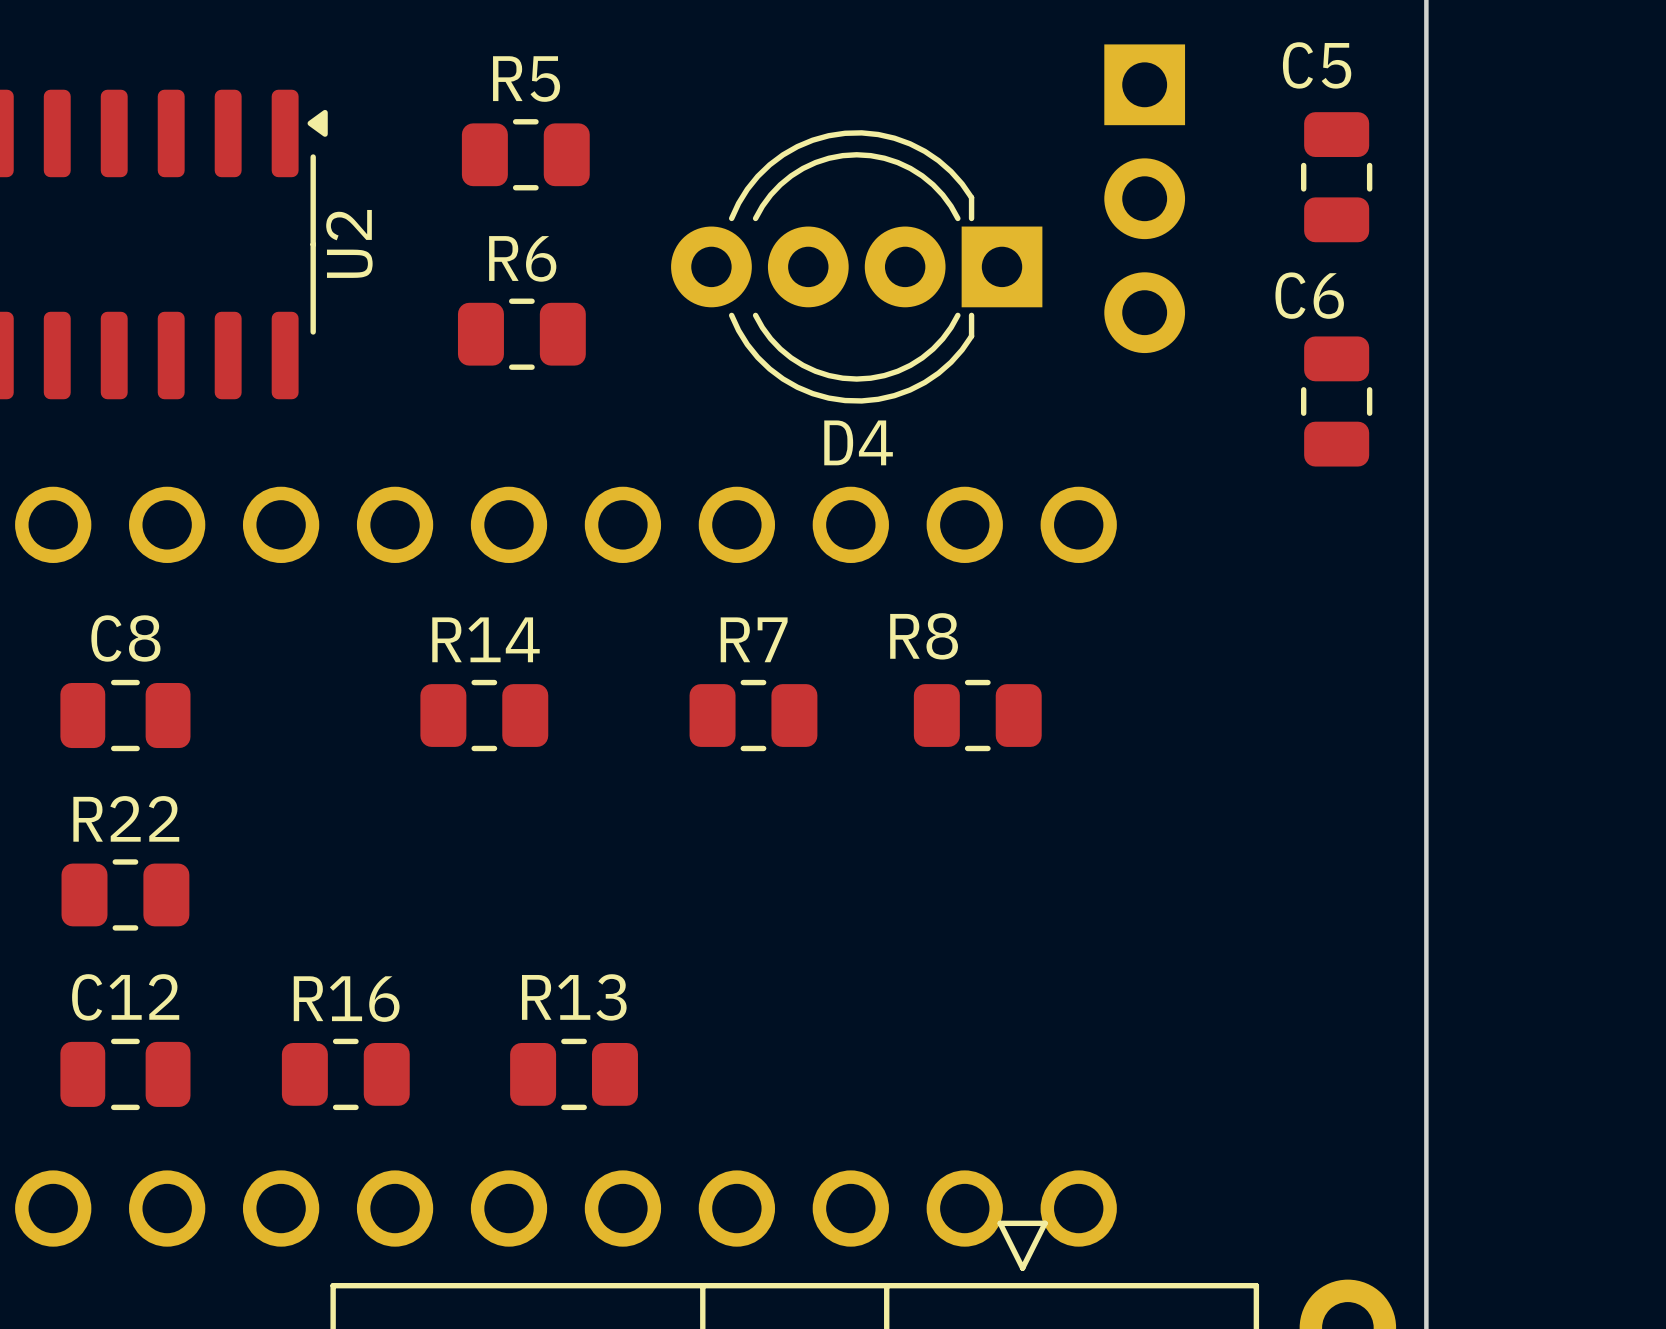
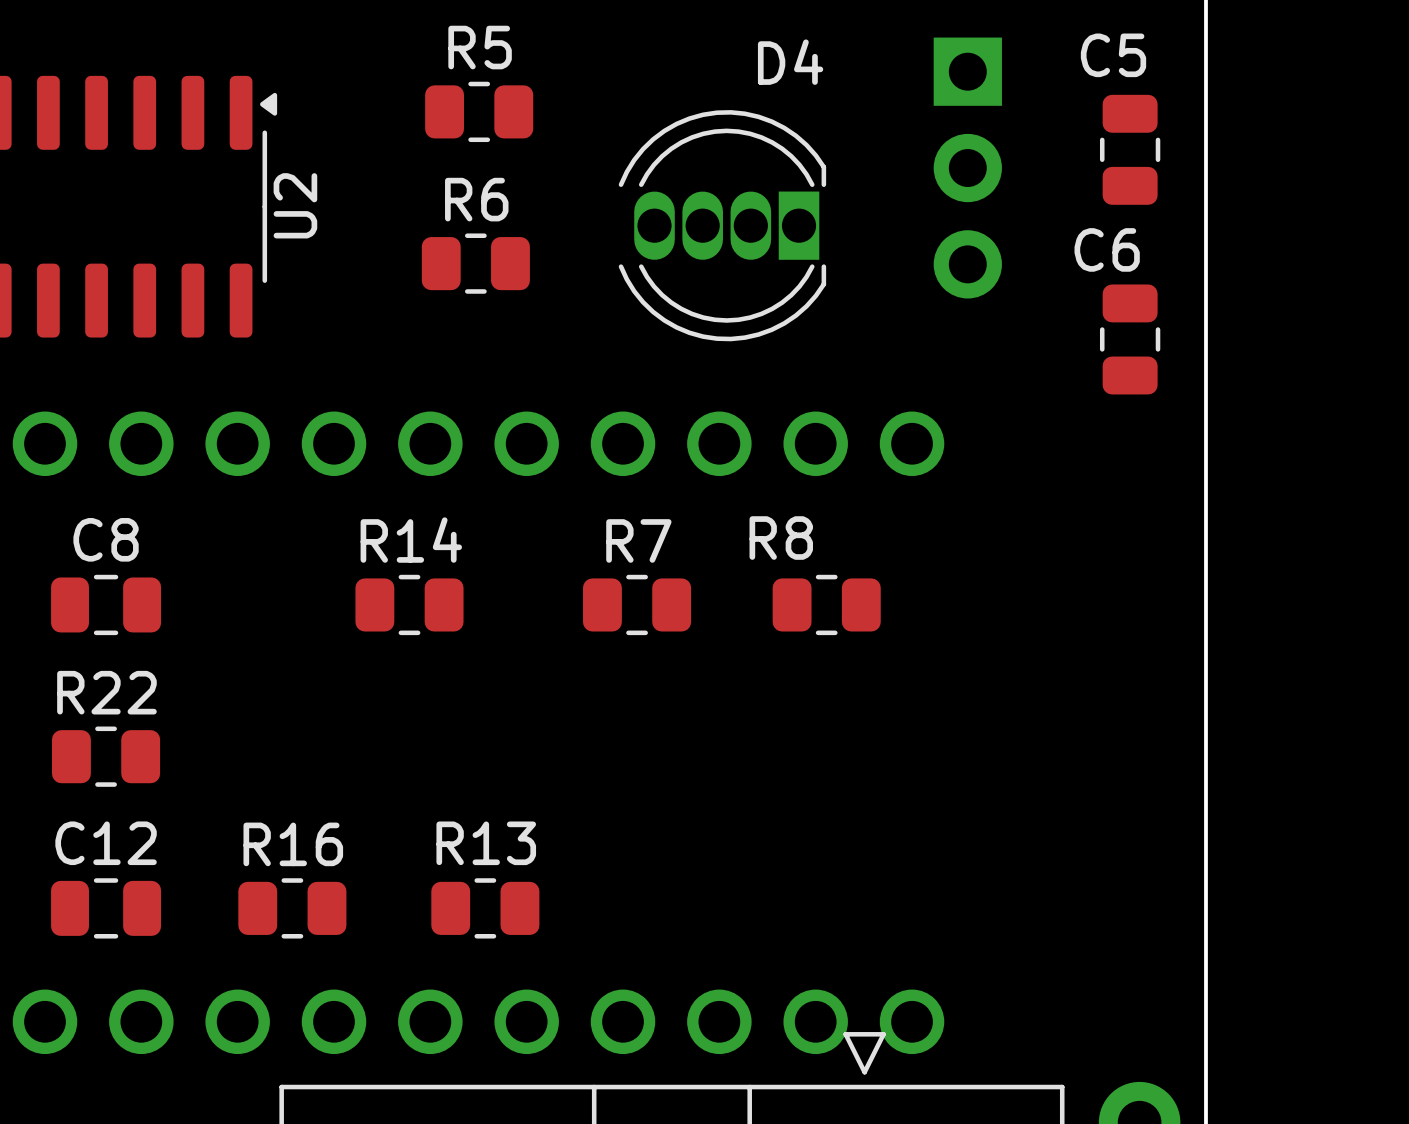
D4 footprint: [671, 130, 1043, 404] -> [618, 110, 827, 342]
R5 position: (525, 154) -> (479, 111)
R6 position: (521, 334) -> (475, 263)
D4 name position: D4 (858, 442) -> D4 (790, 62)

